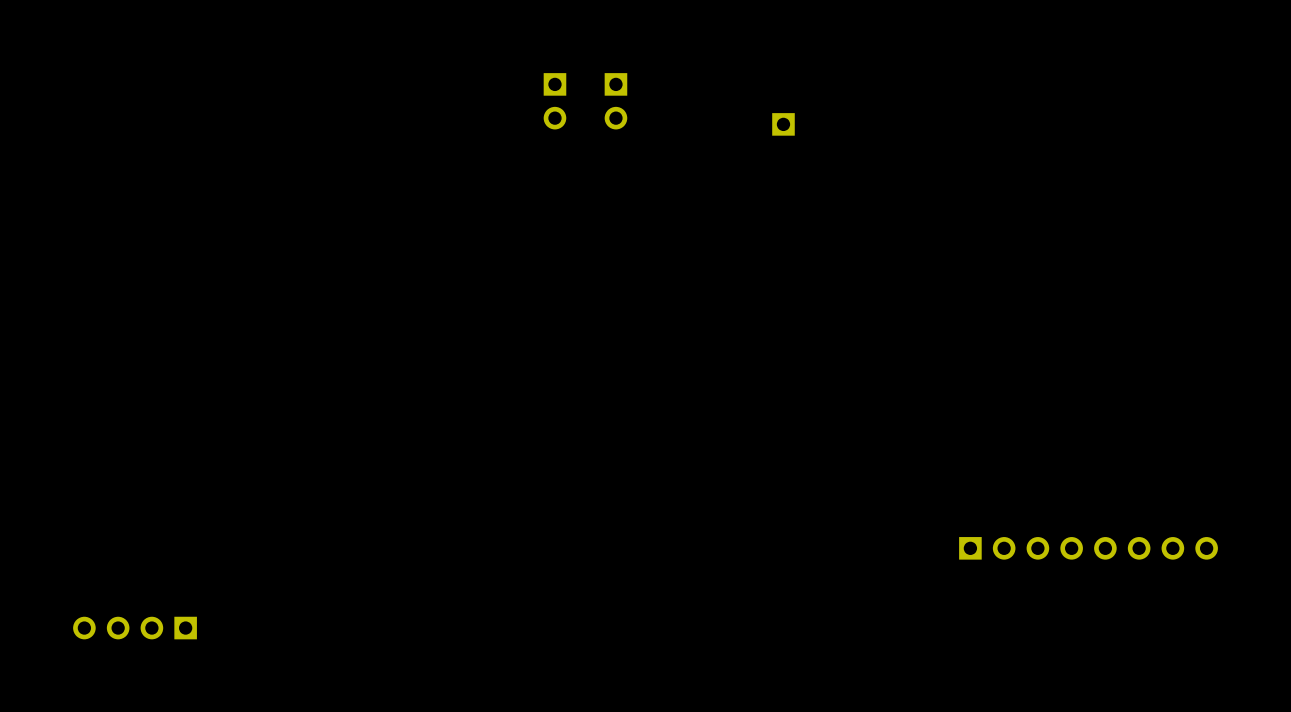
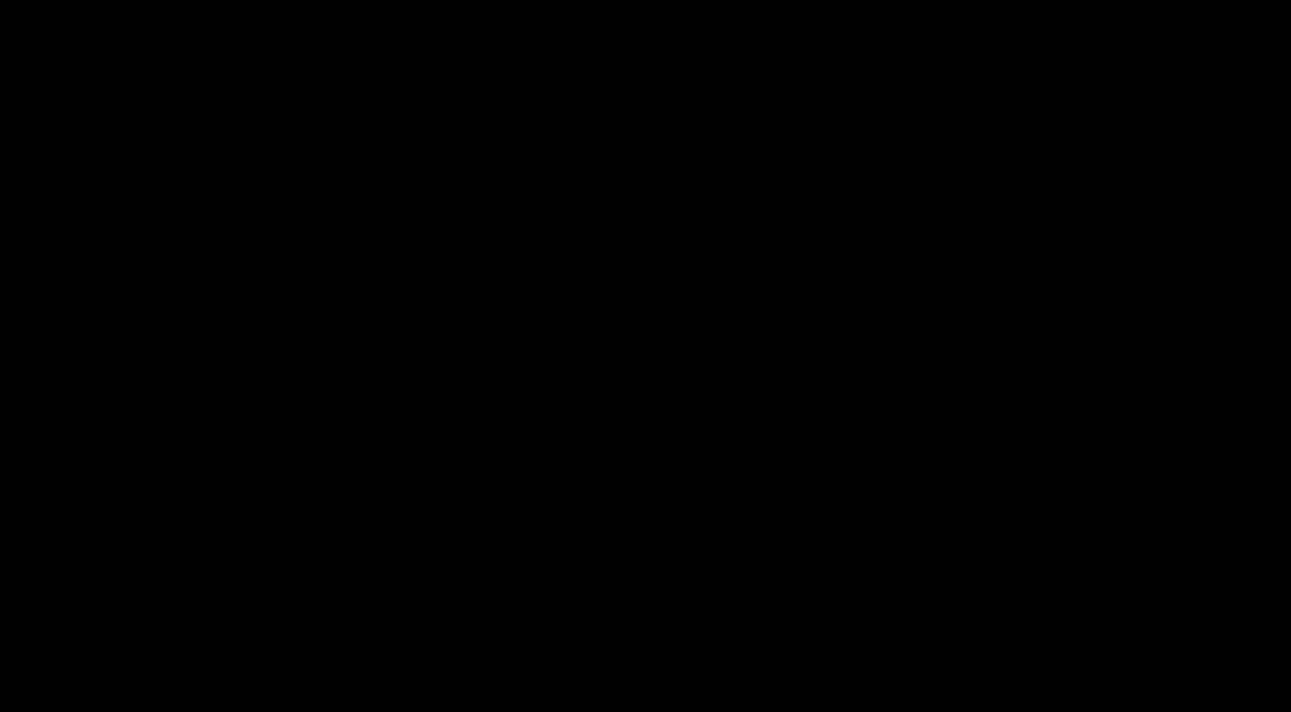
part: (554, 101) -> none
part: (615, 101) -> none
part: (783, 124) -> none
part: (1088, 548) -> none
part: (135, 628) -> none

